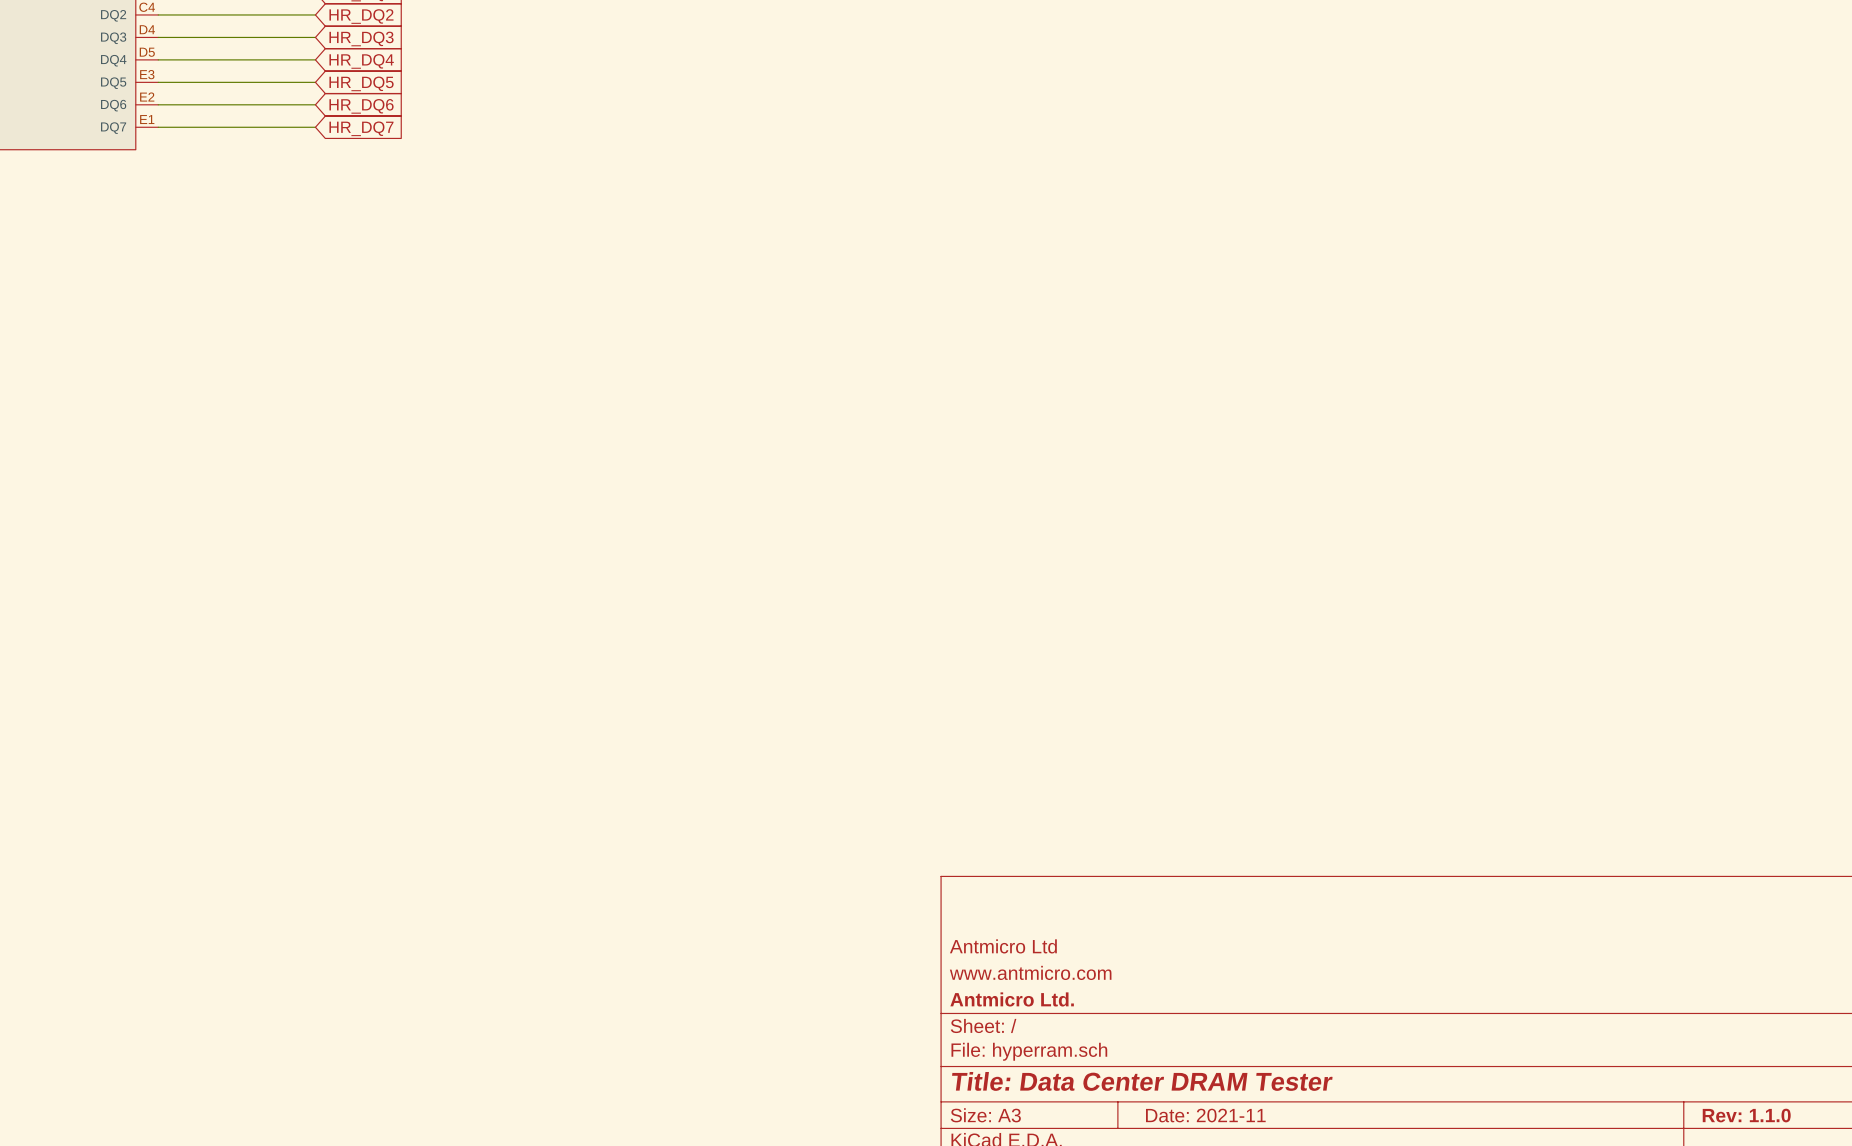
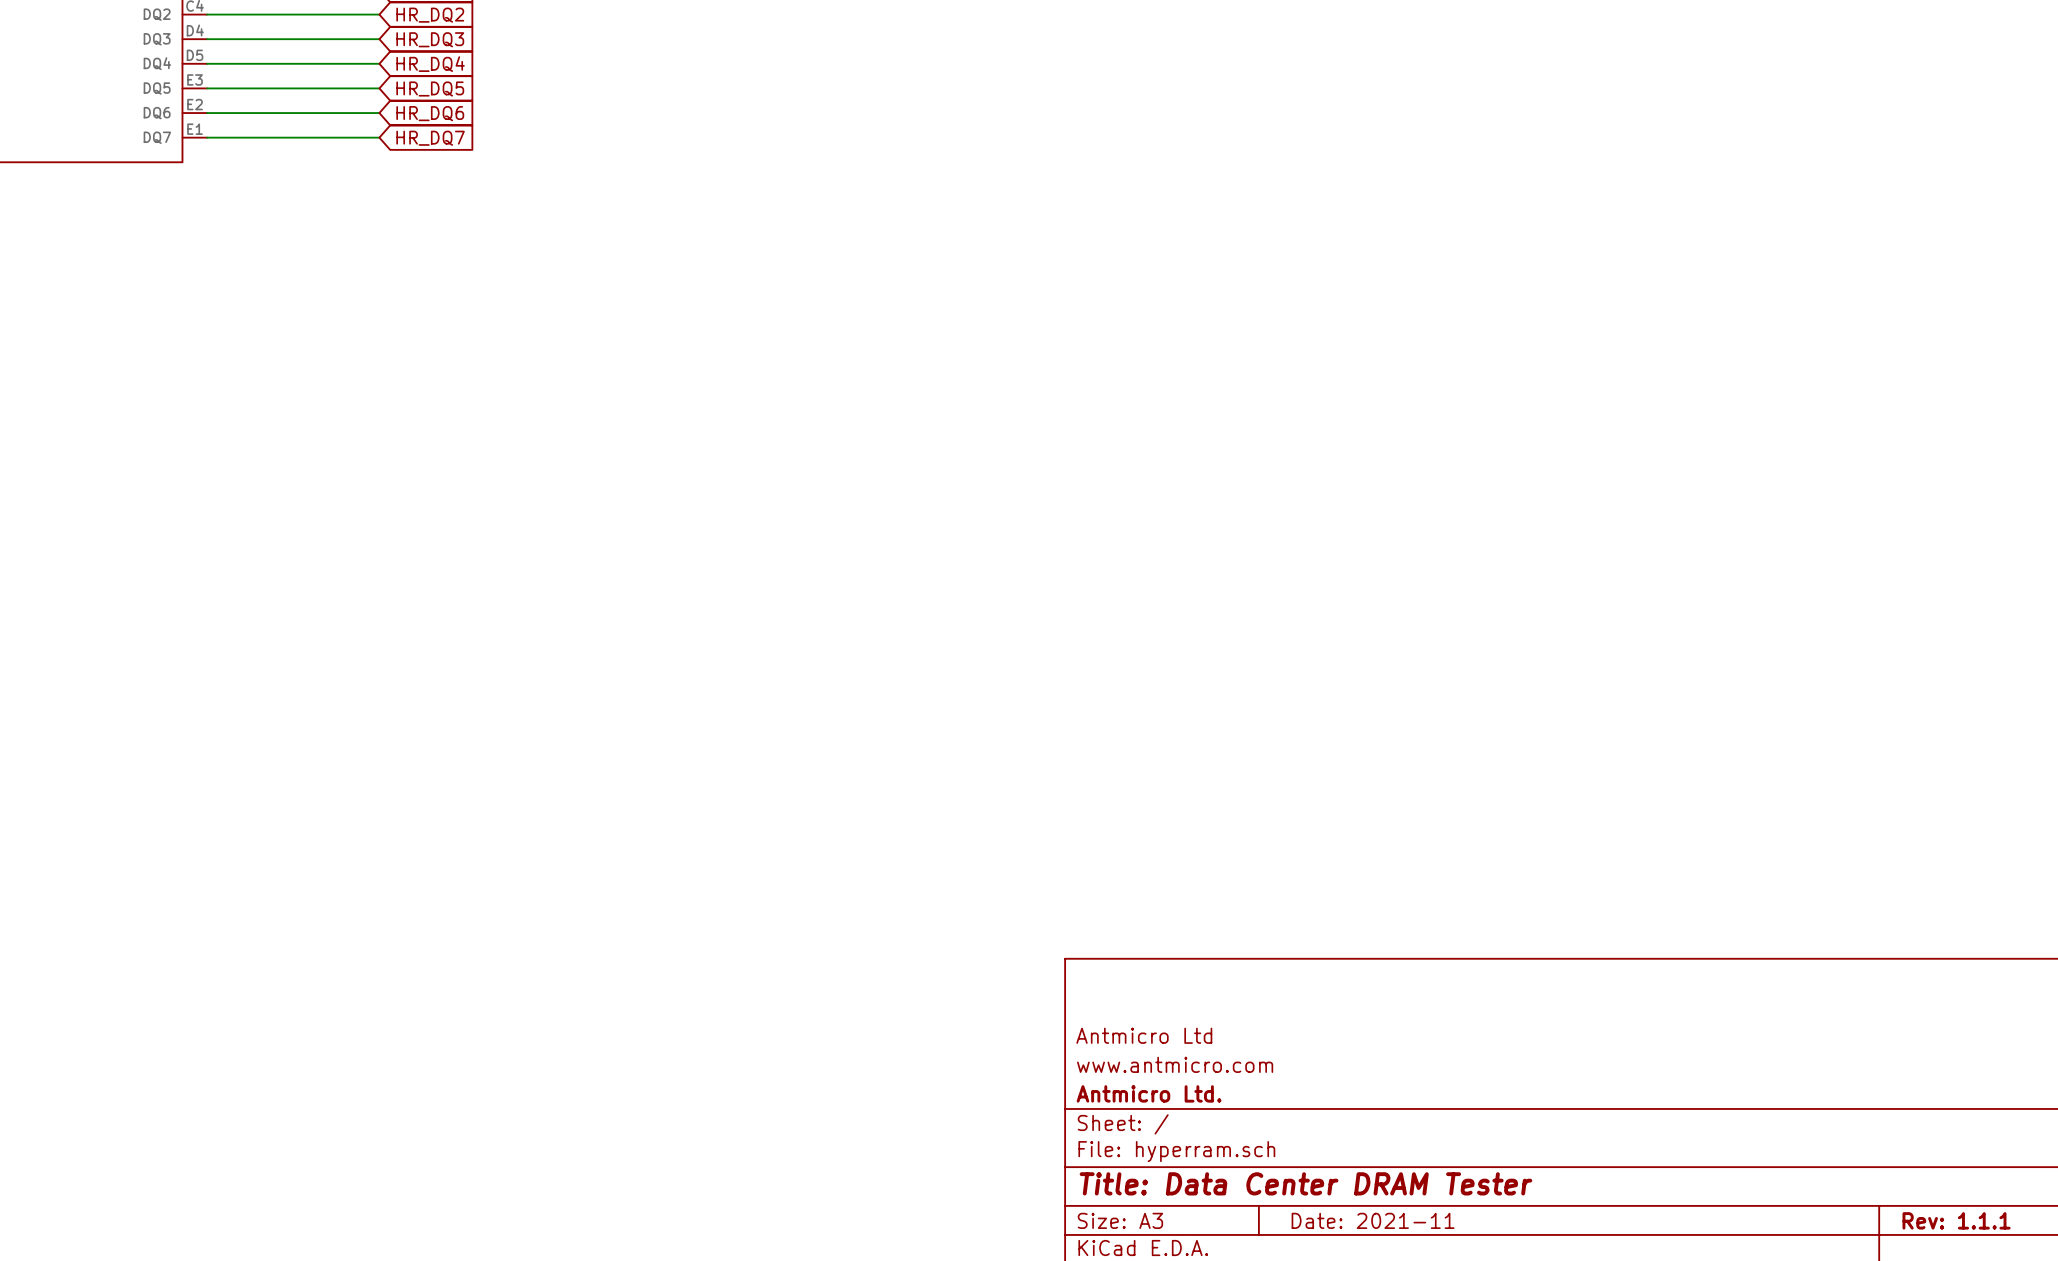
title block: Rev: 1.1.0 (1746, 1115) -> Rev: 1.1.1 (1956, 1220)

